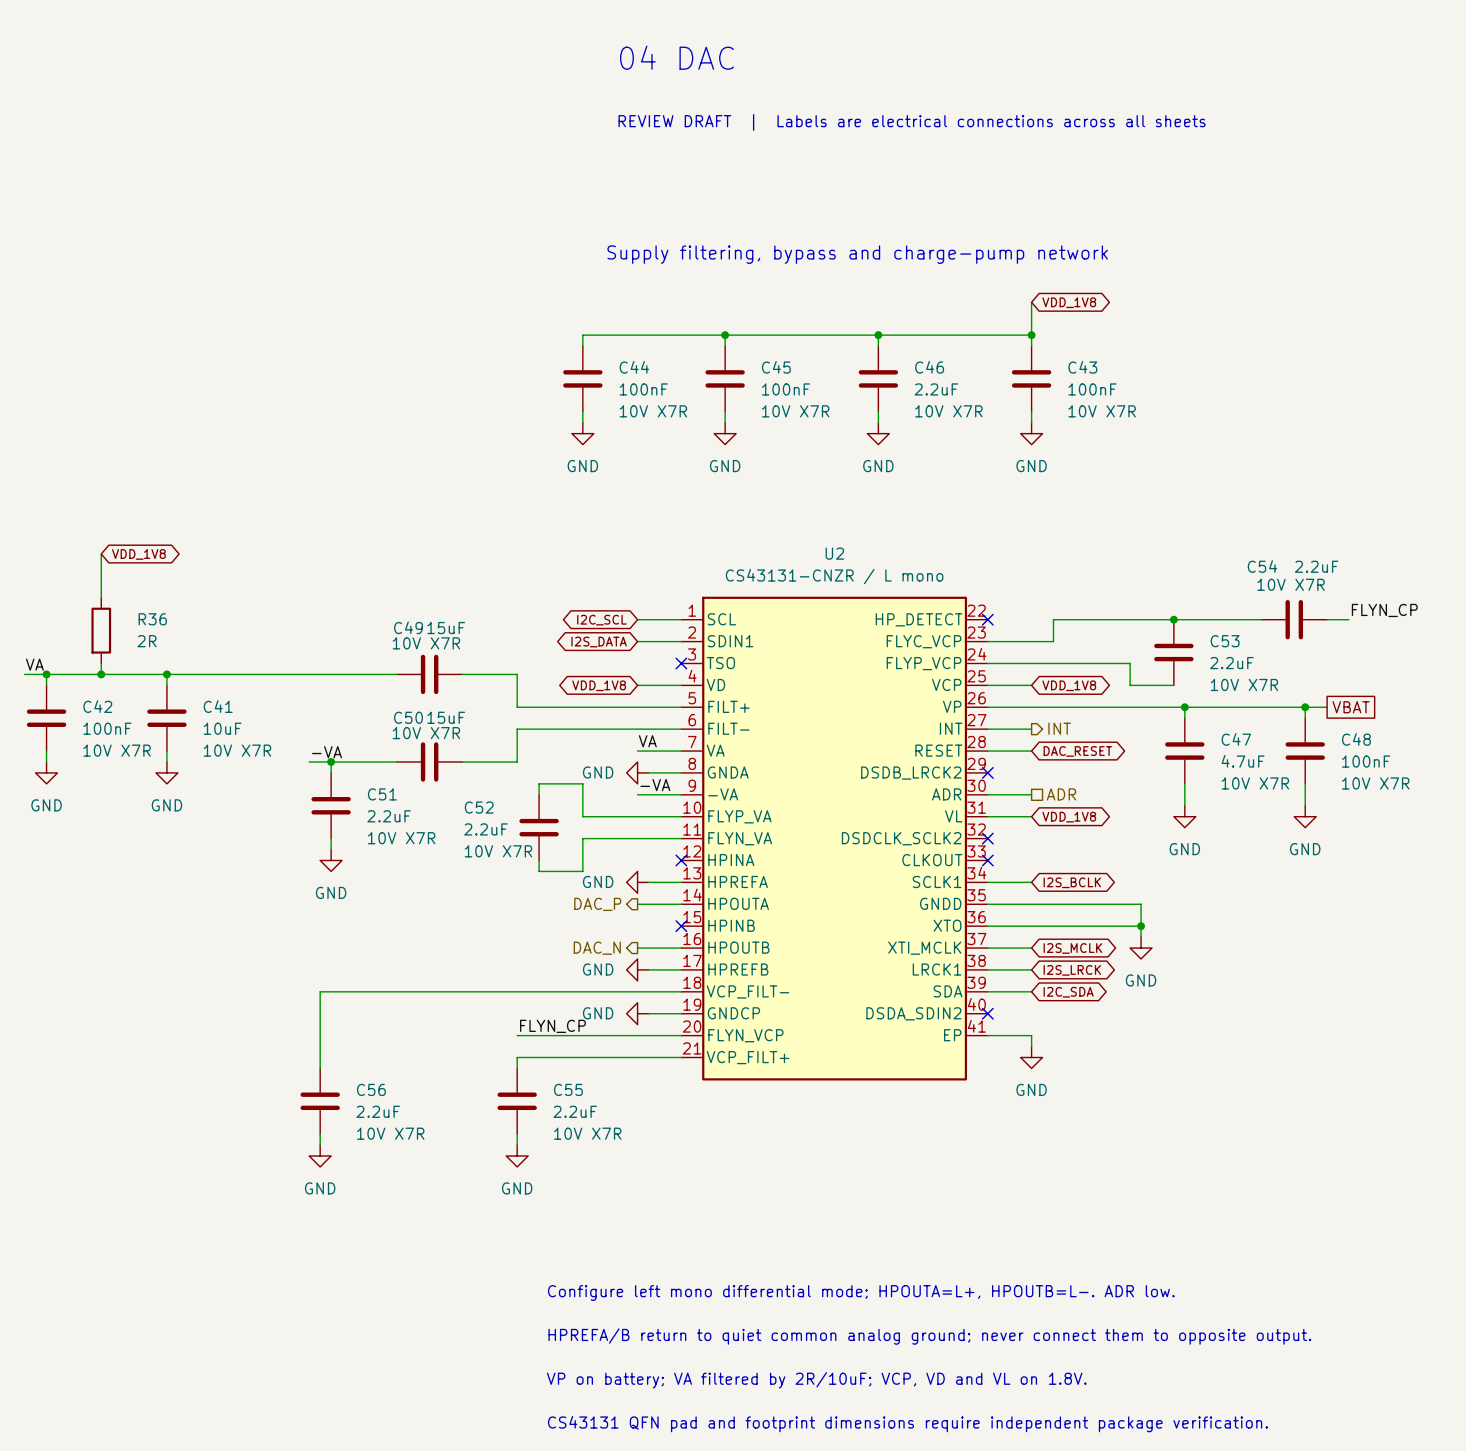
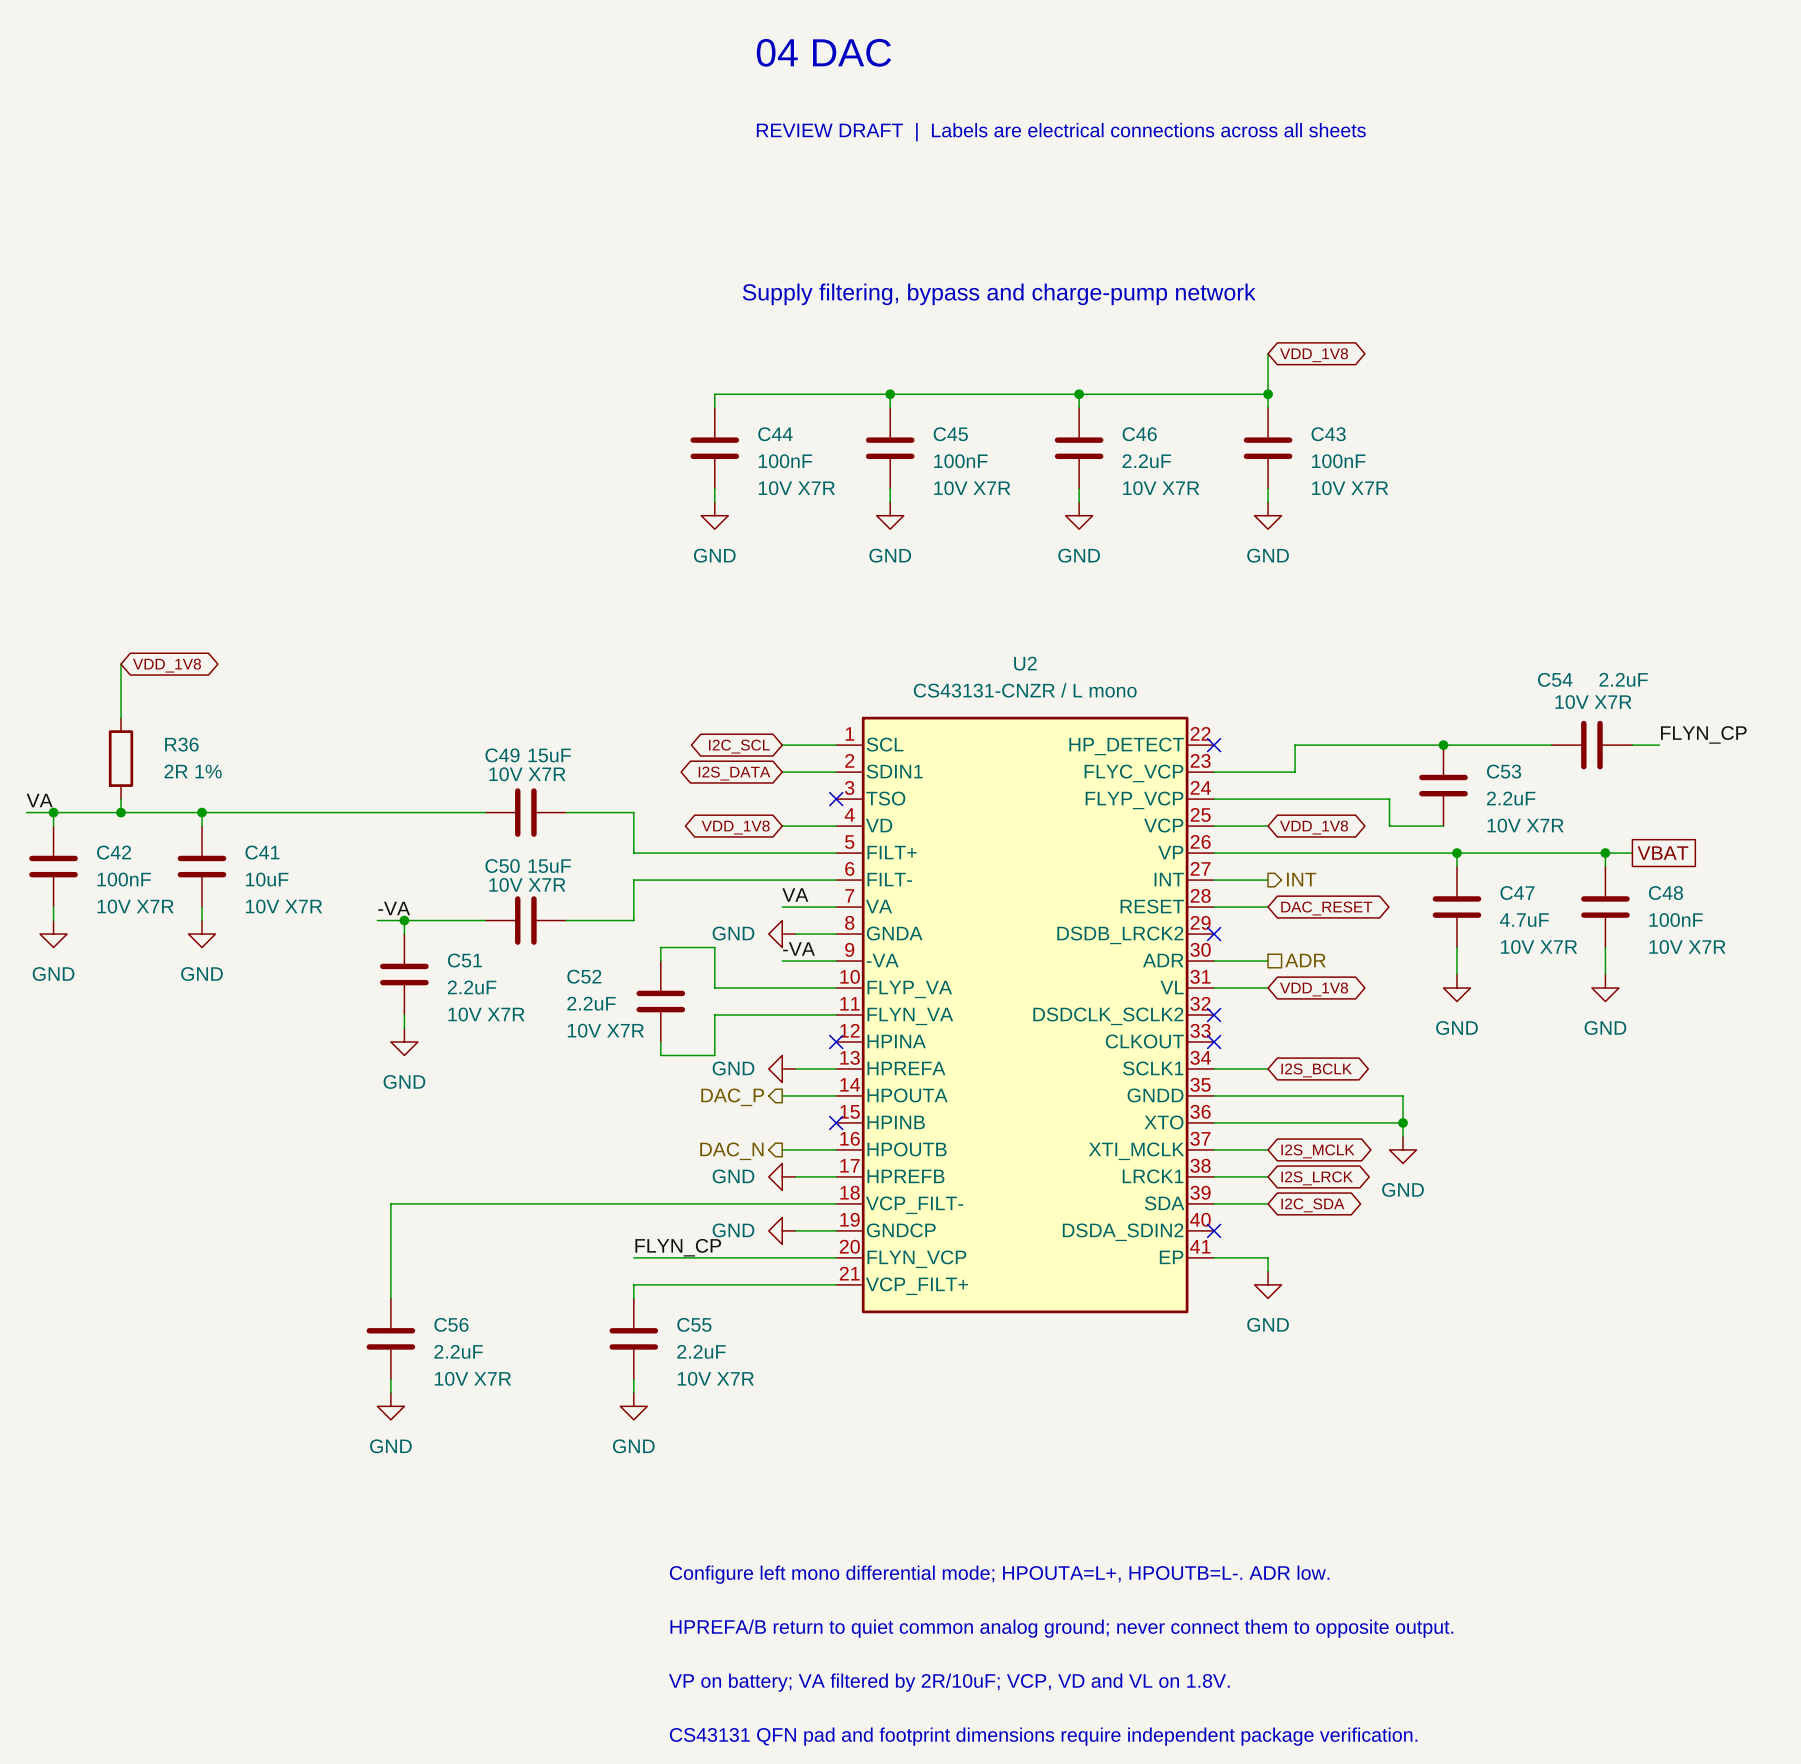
R36 value: 2R (147, 641) -> 2R 1% (193, 771)

